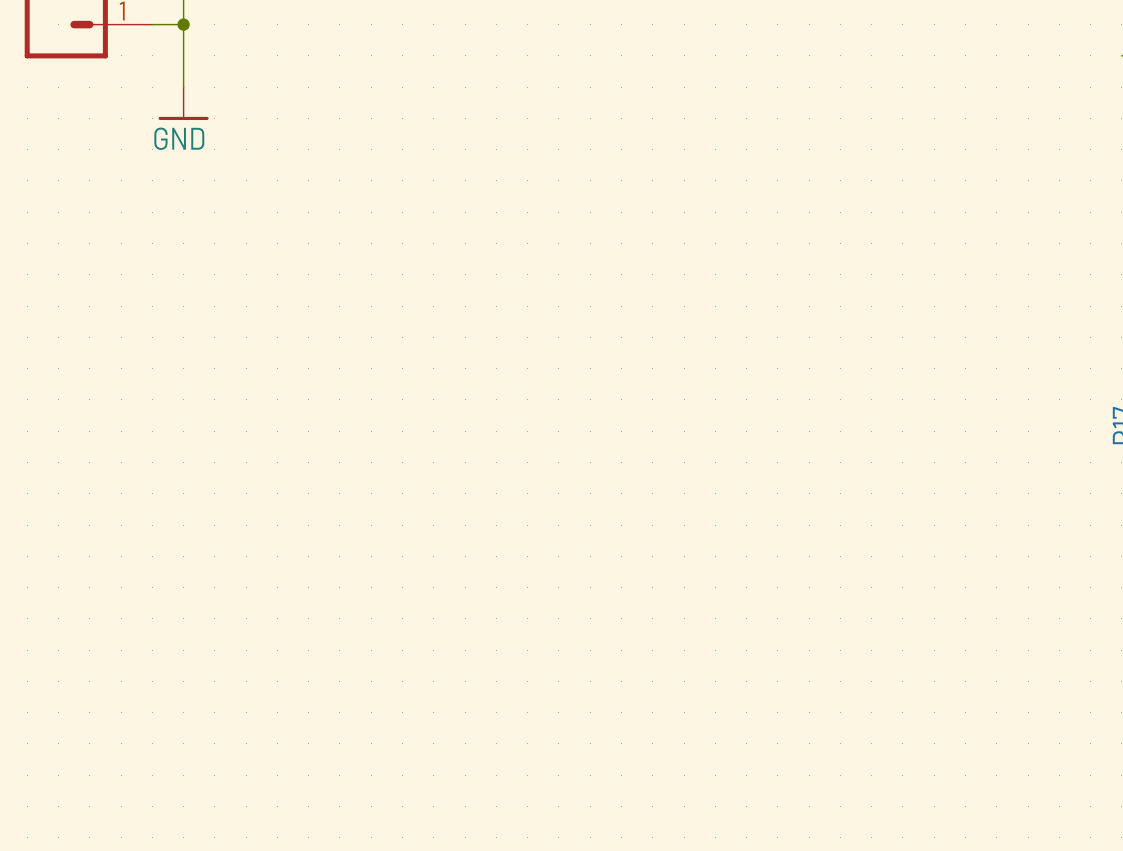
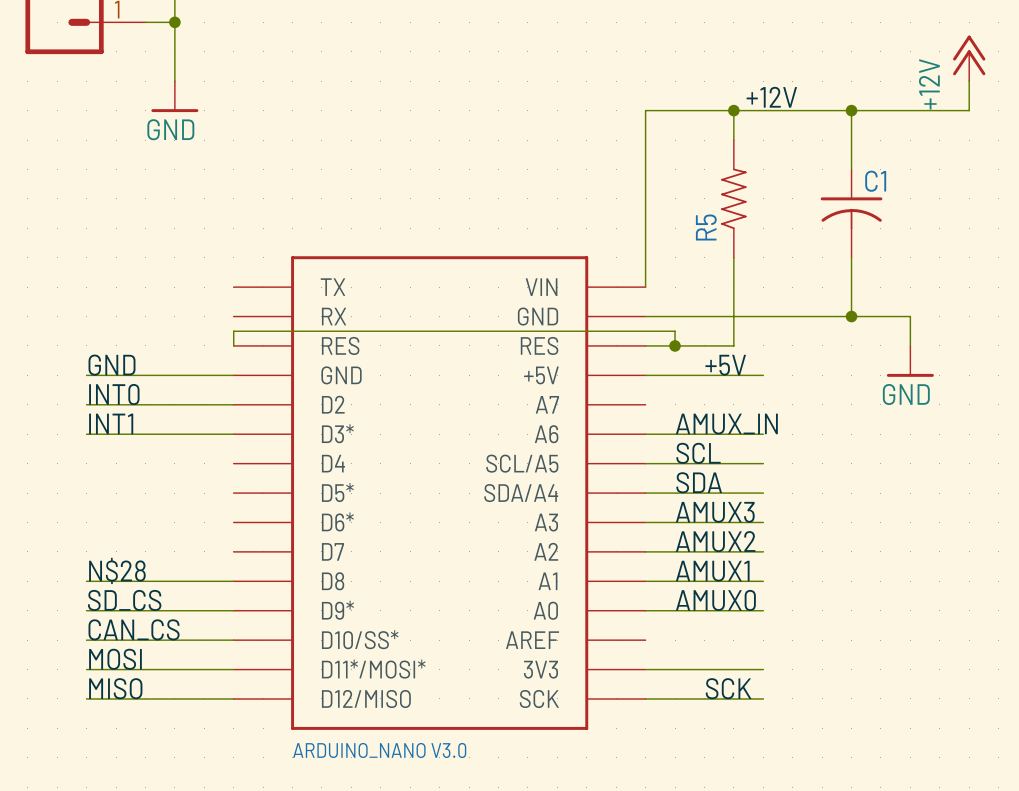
power symbol: none -> +12V (969, 58)
wire: none -> (969, 81) (969, 110) (645, 110) (645, 287)
label: none -> +12V (771, 97)
wire: none -> (733, 110) (733, 140)
junction: none -> (733, 110)
wire: none -> (851, 110) (851, 169)
junction: none -> (851, 110)
R5: none -> (733, 198)
C1: none -> (851, 213)
wire: none -> (733, 257) (733, 345) (645, 345)
wire: none -> (851, 257) (851, 316)
wire: none -> (645, 316) (910, 316) (910, 345)
junction: none -> (851, 316)
wire: none -> (233, 345) (233, 331) (675, 331) (675, 345)
junction: none -> (675, 345)
power symbol: none -> GND (910, 361)
label: none -> GND (112, 365)
label: none -> +5V (725, 365)
wire: none -> (86, 375) (233, 375)
wire: none -> (645, 375) (763, 375)
label: none -> INT0 (114, 394)
wire: none -> (86, 404) (233, 404)
label: none -> INT1 (111, 423)
label: none -> AMUX_IN (726, 424)
wire: none -> (86, 434) (233, 434)
wire: none -> (645, 434) (763, 434)
label: none -> SCL (698, 453)
wire: none -> (645, 463) (763, 463)
label: none -> SDA (699, 482)
part: none -> (439, 493)
wire: none -> (645, 493) (763, 493)
label: none -> AMUX3 (715, 512)
wire: none -> (645, 522) (763, 522)
label: none -> AMUX2 (715, 541)
wire: none -> (645, 551) (763, 551)
label: none -> N$28 (117, 570)
label: none -> AMUX1 (712, 571)
wire: none -> (86, 581) (233, 581)
wire: none -> (645, 581) (763, 581)
label: none -> SD_CS (124, 600)
label: none -> AMUX0 (715, 600)
wire: none -> (86, 610) (233, 610)
wire: none -> (645, 610) (763, 610)
label: none -> CAN_CS (134, 629)
wire: none -> (86, 640) (233, 640)
label: none -> MOSI (115, 659)
wire: none -> (86, 669) (233, 669)
wire: none -> (645, 669) (763, 669)
label: none -> MISO (115, 688)
label: none -> SCK (728, 688)
wire: none -> (86, 698) (233, 698)
wire: none -> (645, 698) (763, 698)

